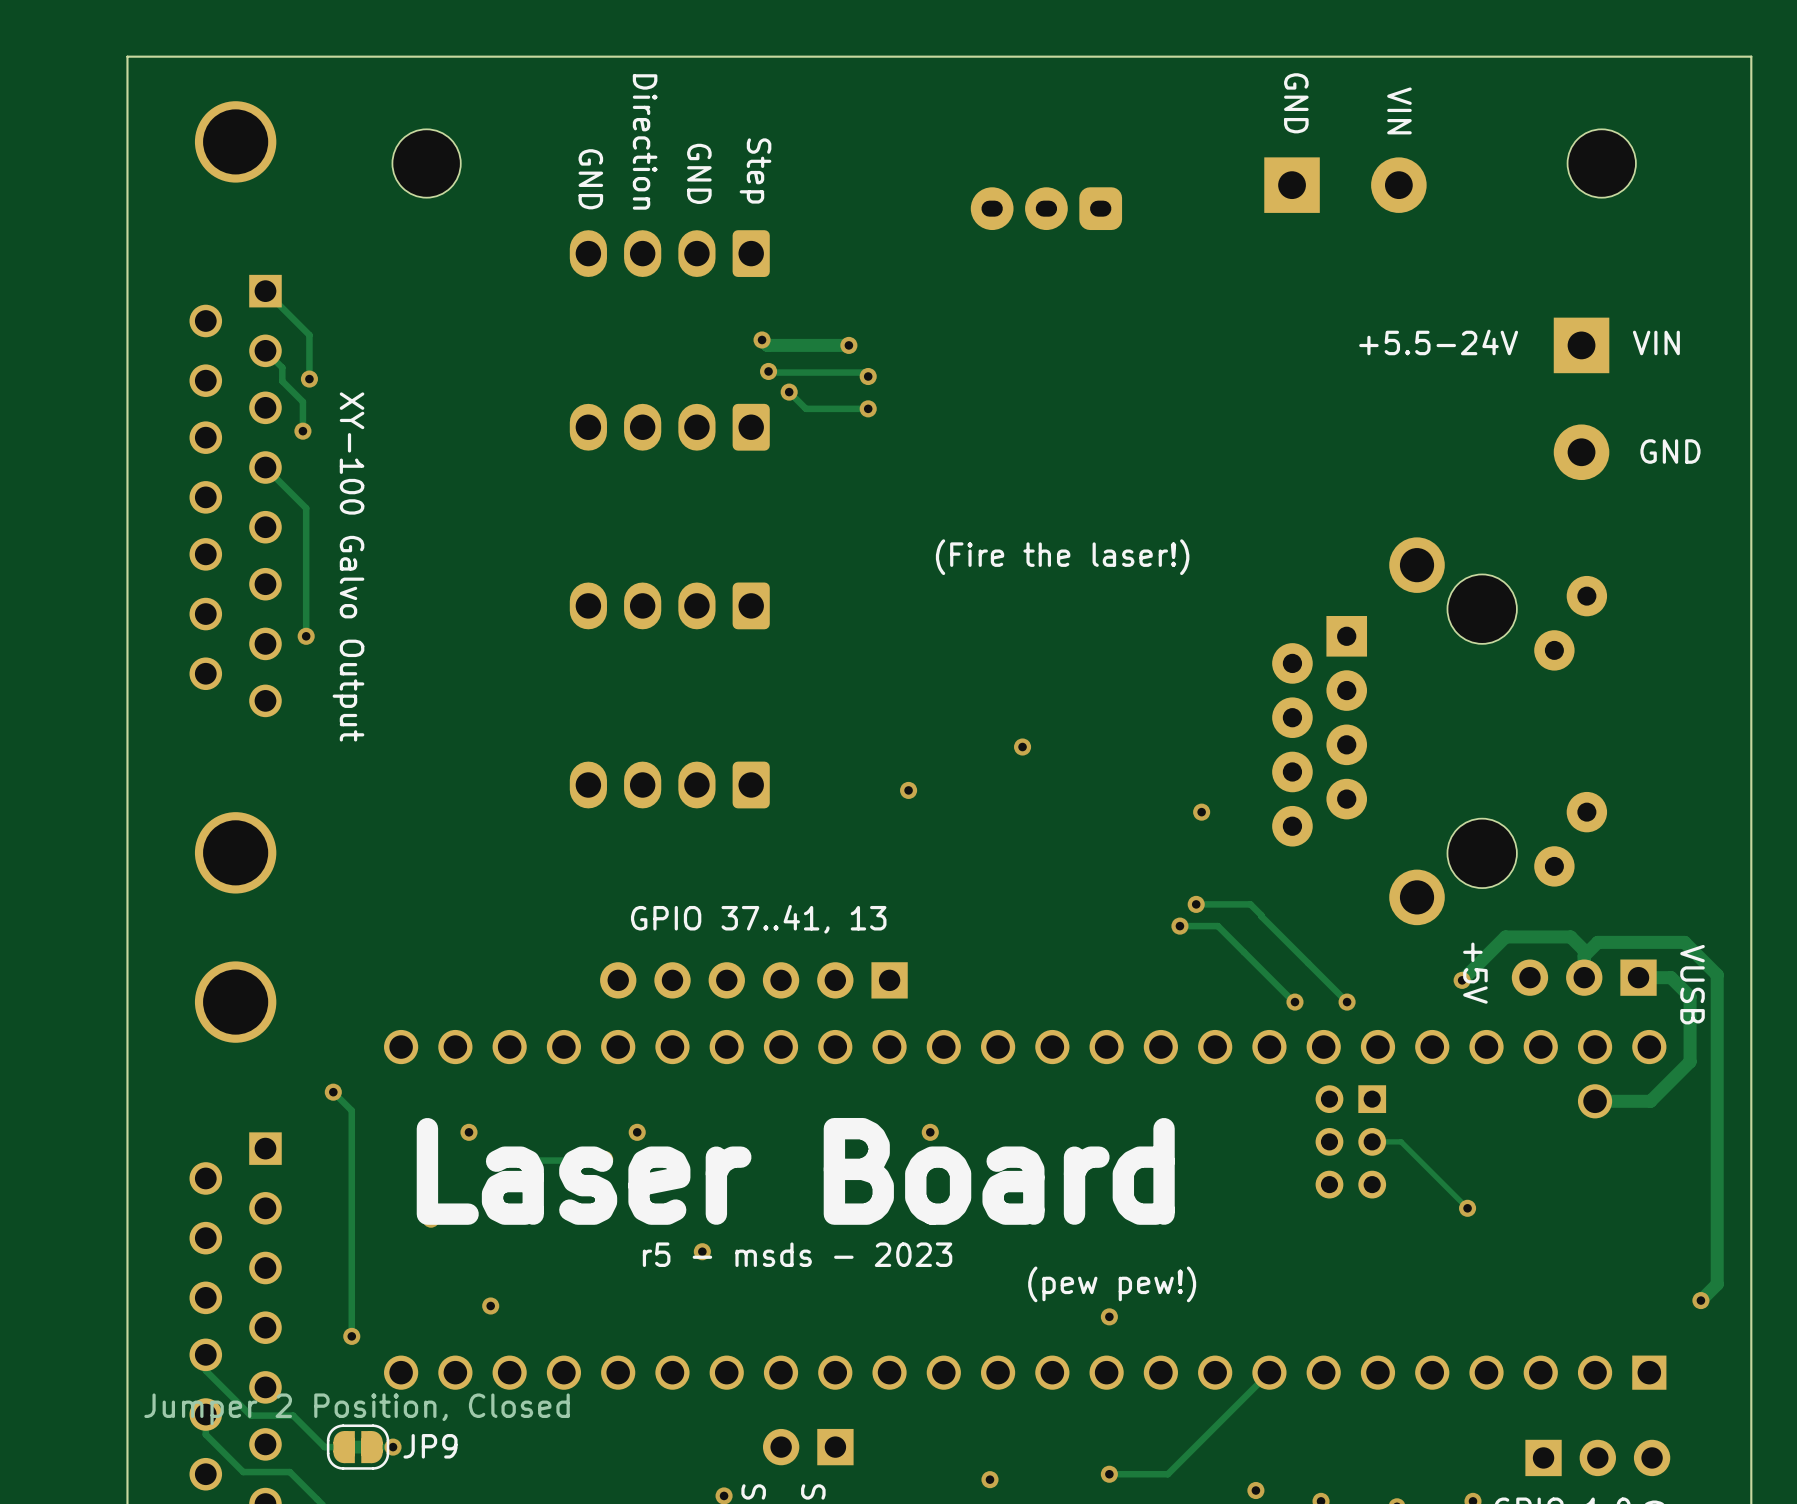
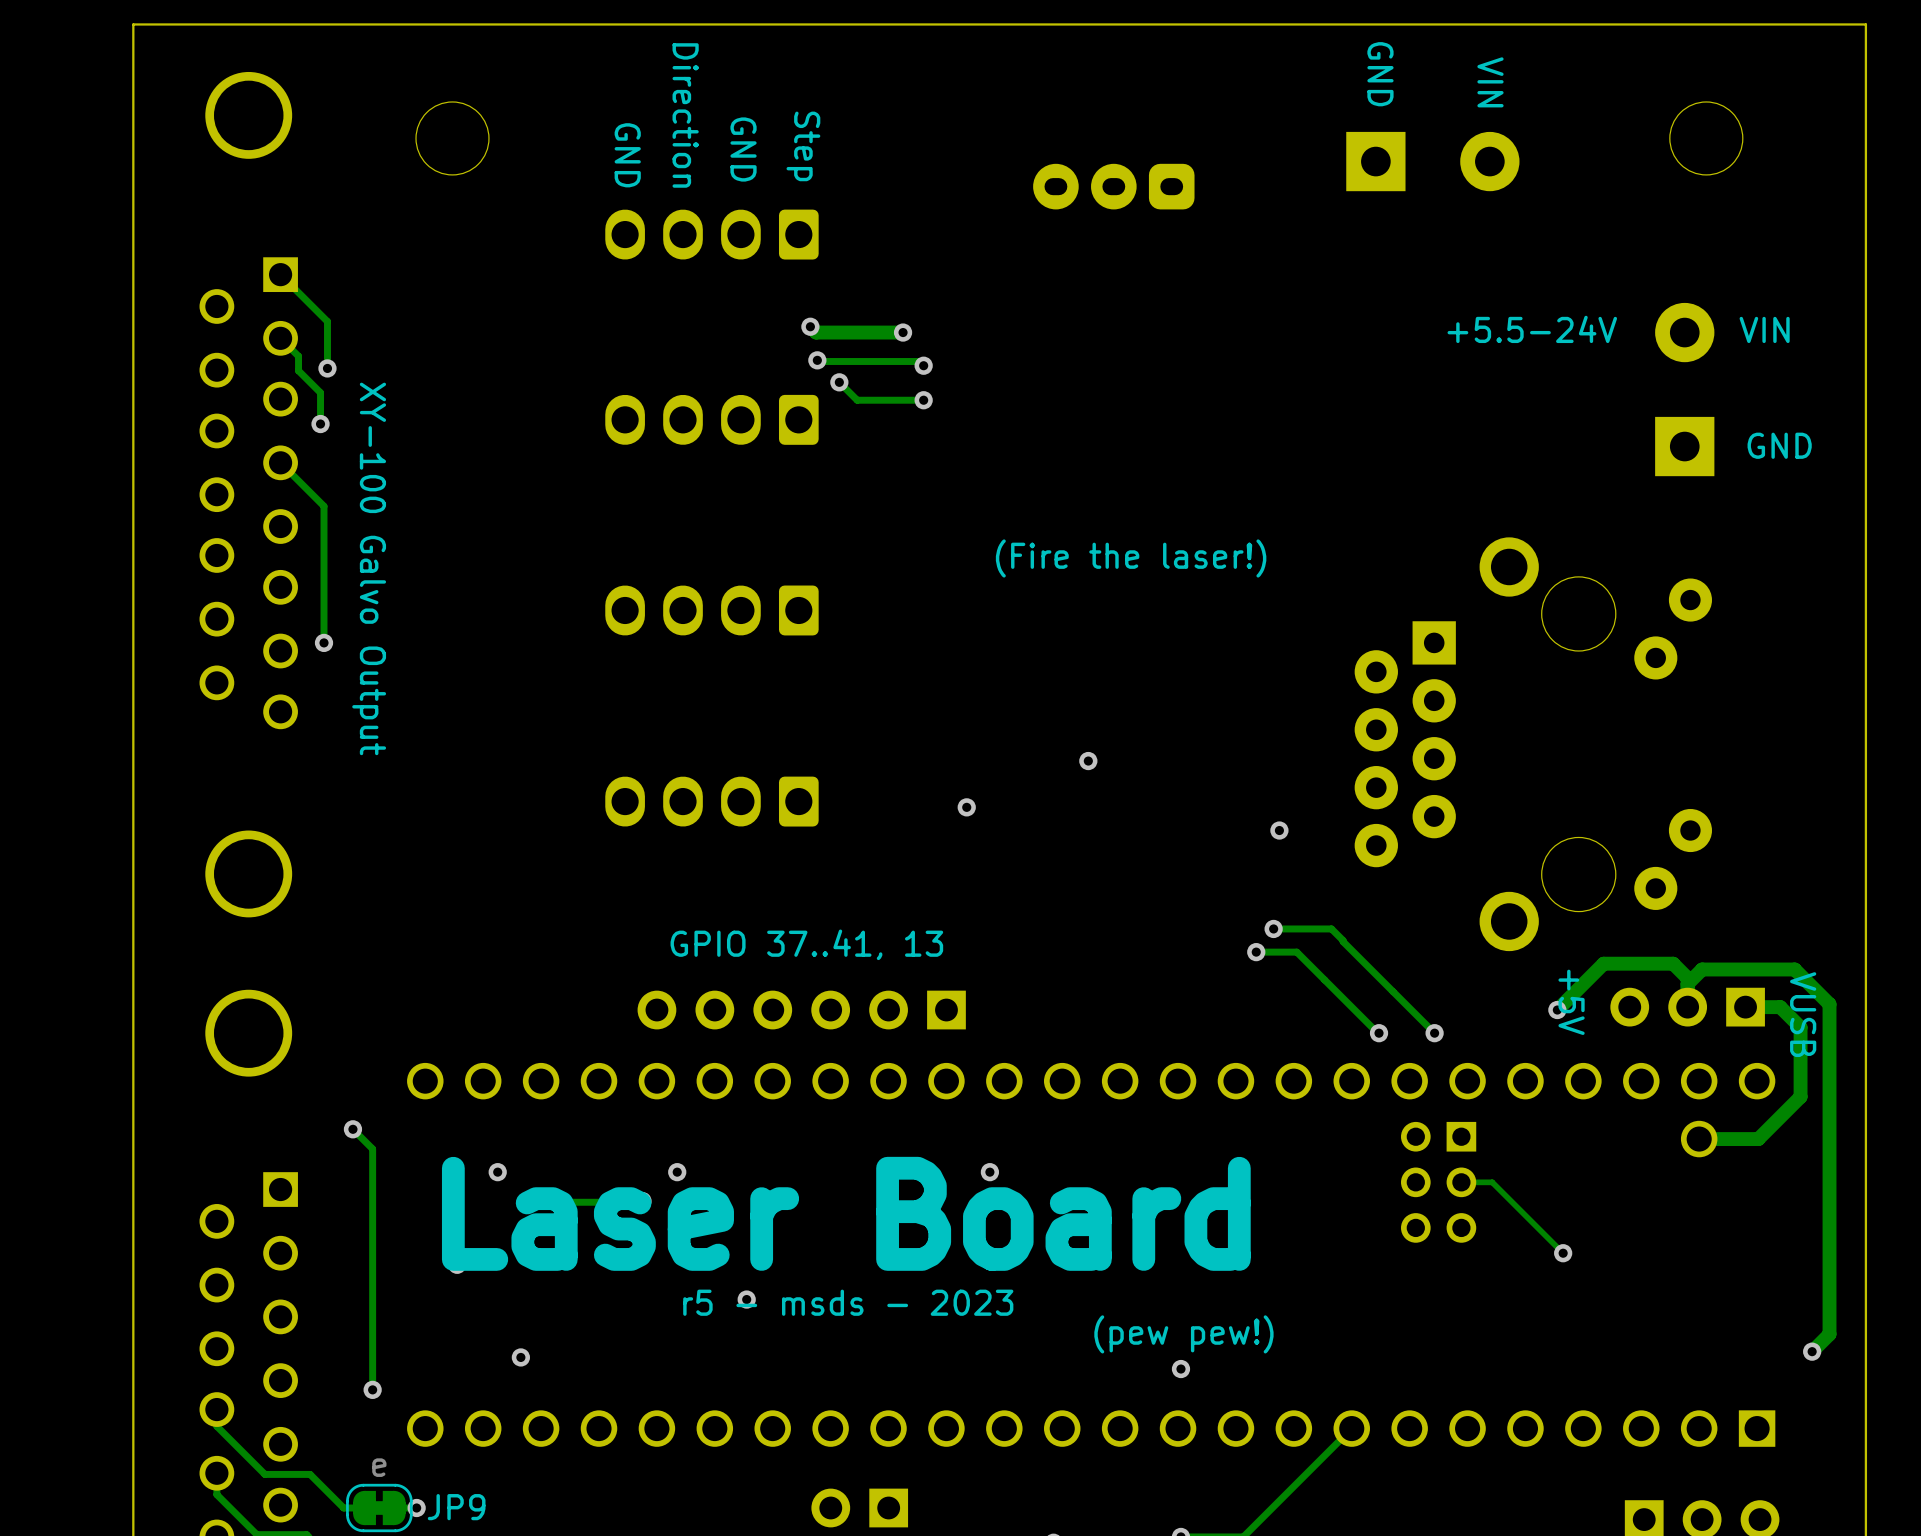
part rotation: 0° (1581, 398) -> 180° (1684, 389)
JP9 value: Jumper 2 Position, Closed (357, 1409) -> e (379, 1467)

